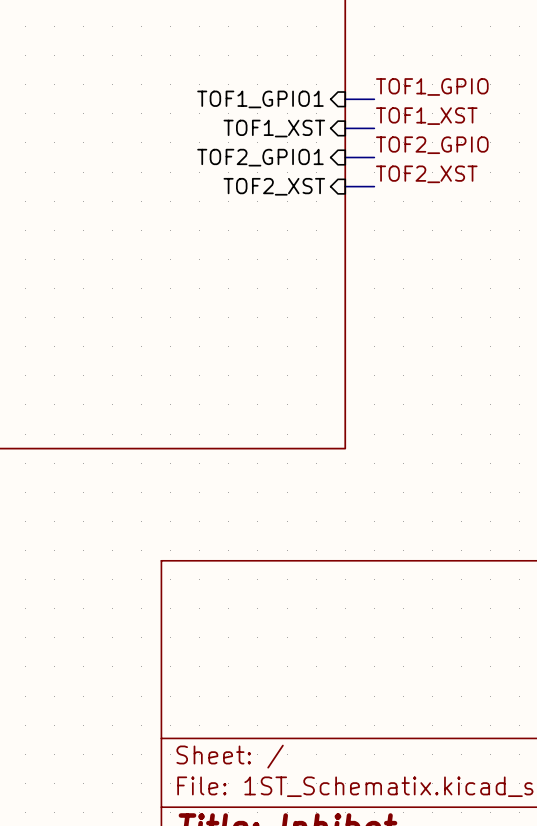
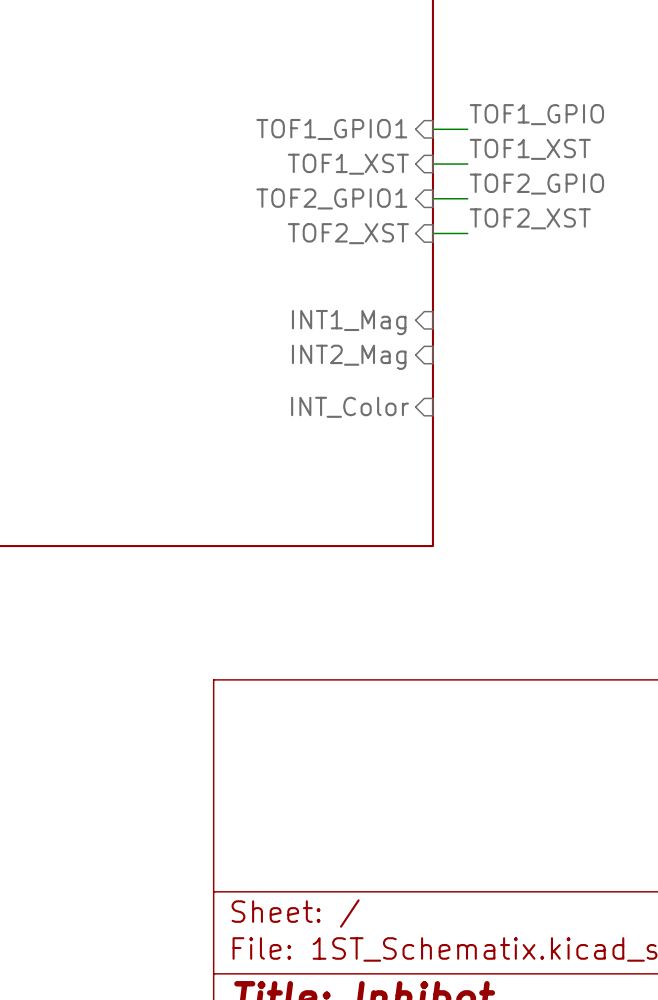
sheet pin: none -> INT1_Mag (349, 322)
sheet pin: none -> INT2_Mag (349, 357)
sheet pin: none -> INT_Color (350, 407)

